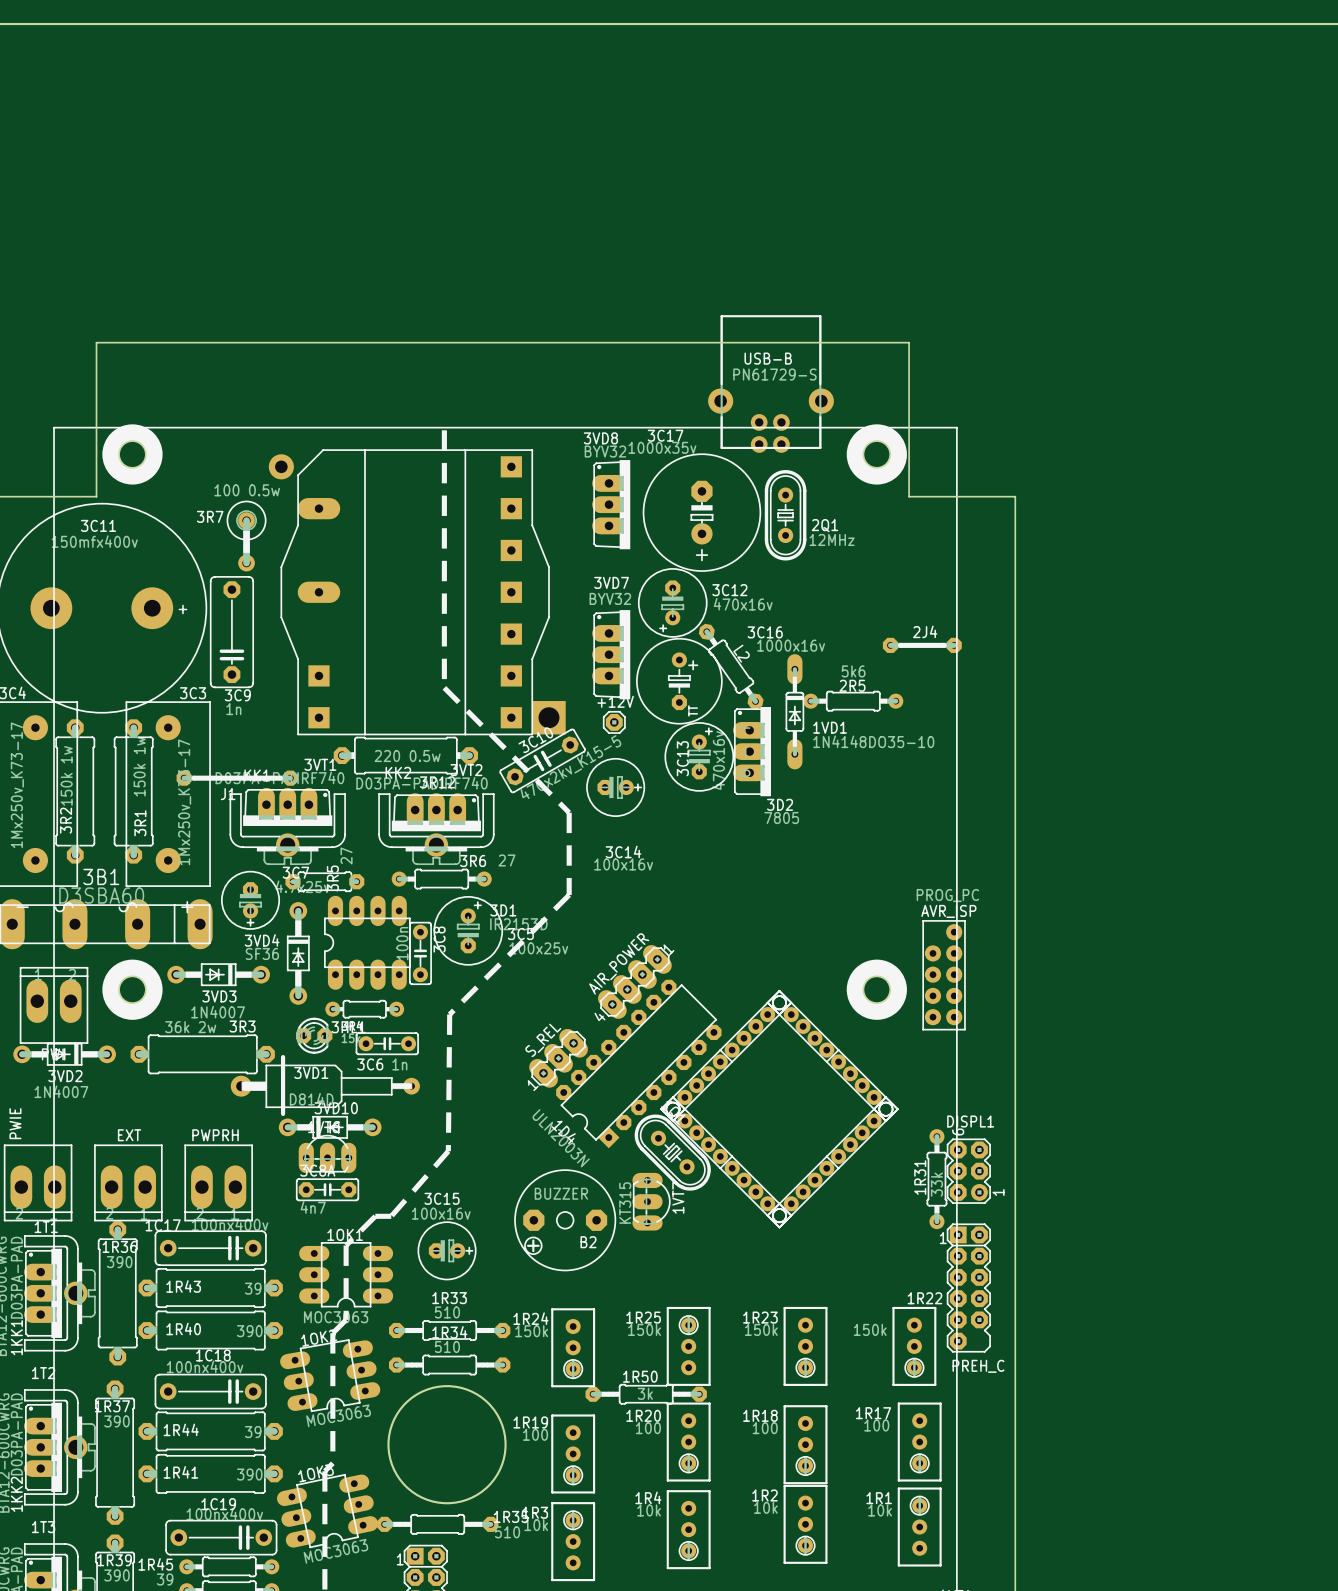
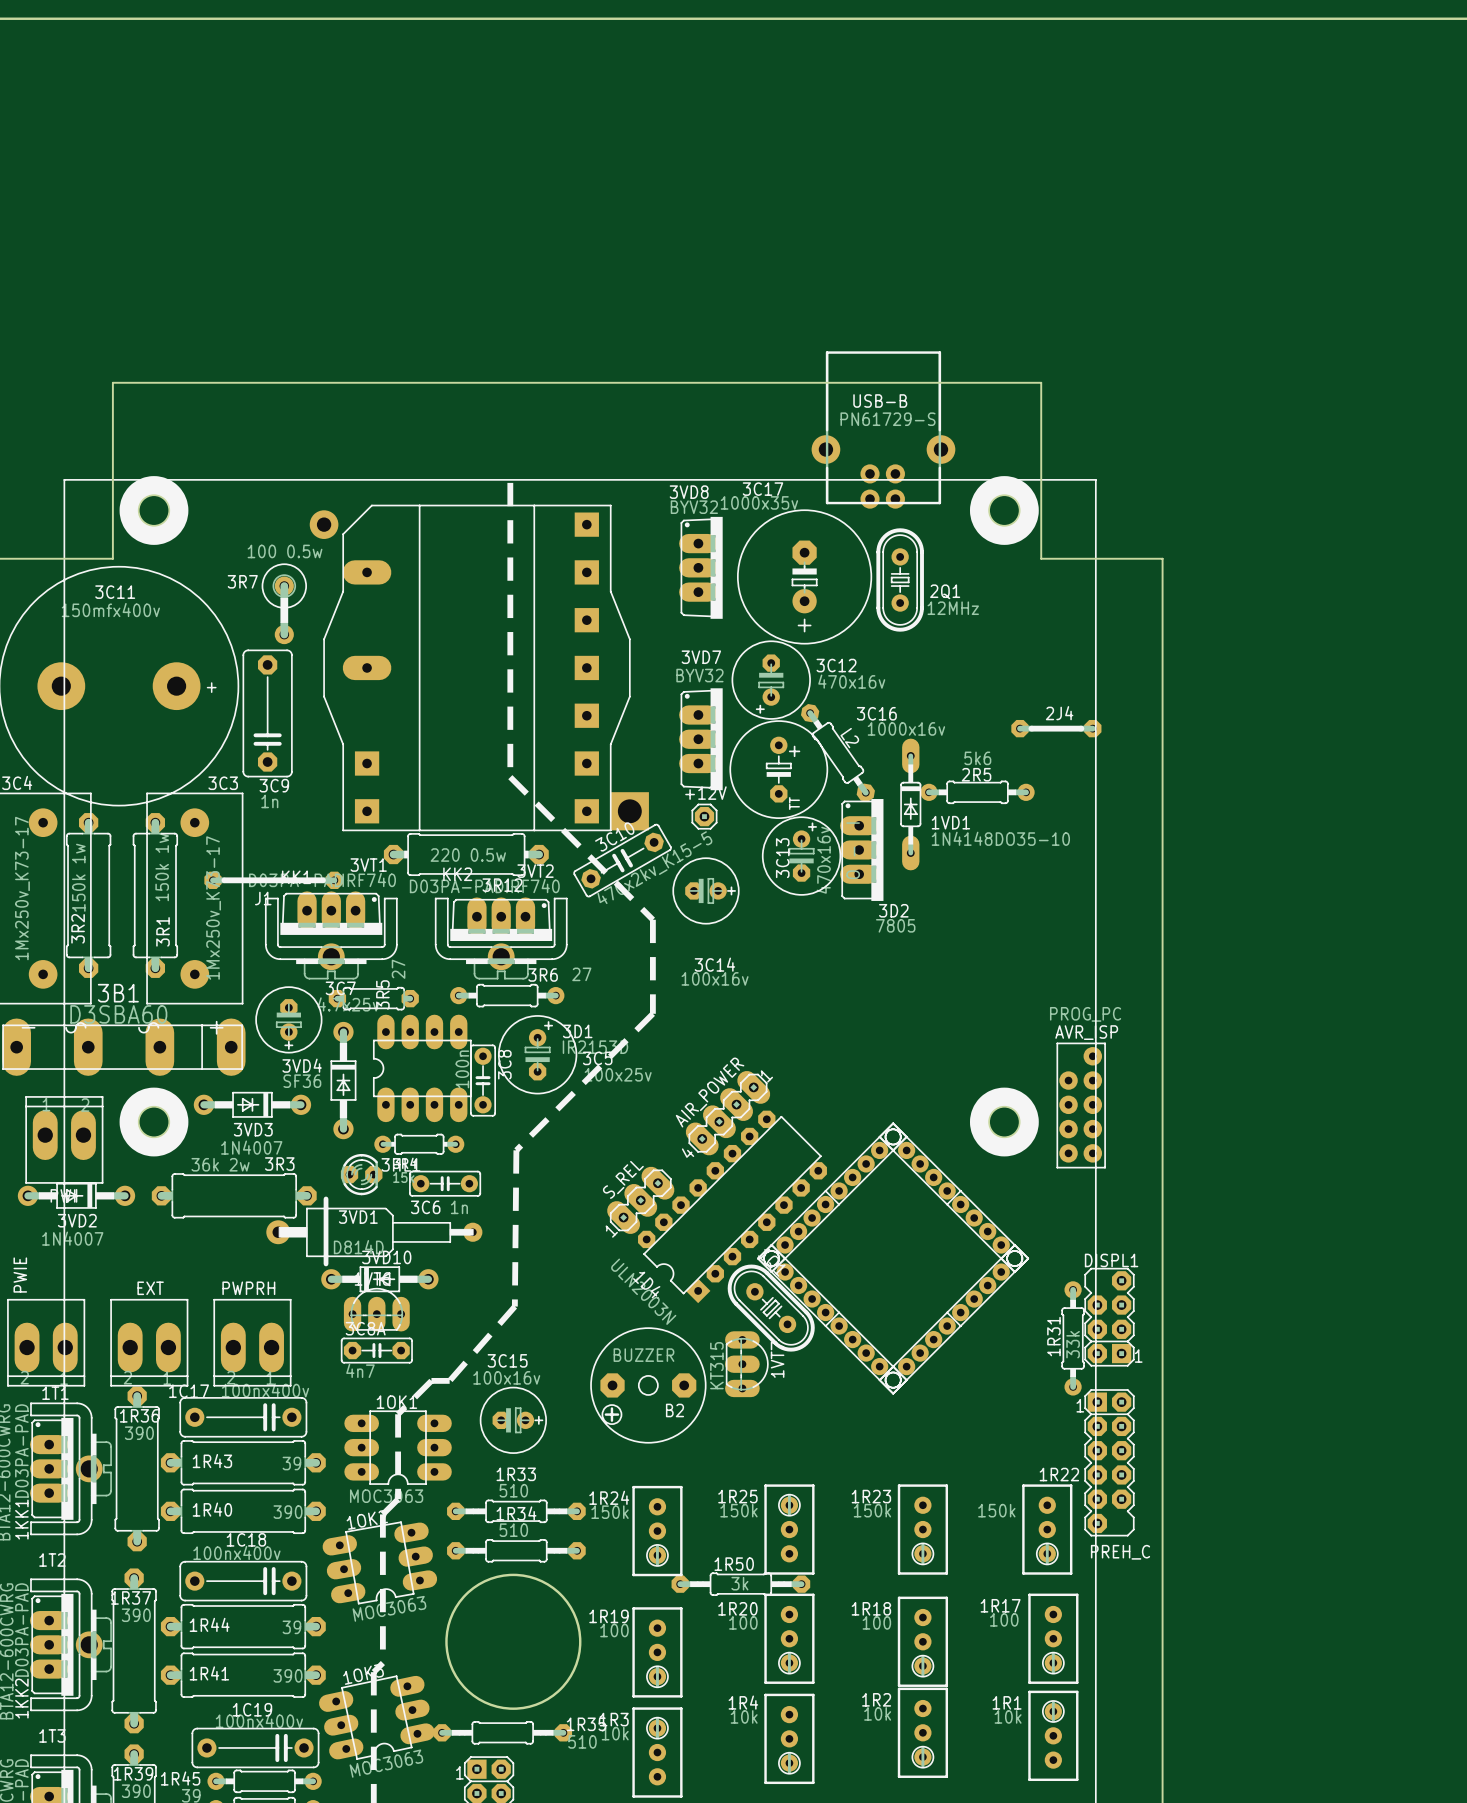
DISPL1 footprint: [946, 1138, 991, 1204] -> [1084, 1267, 1135, 1367]

